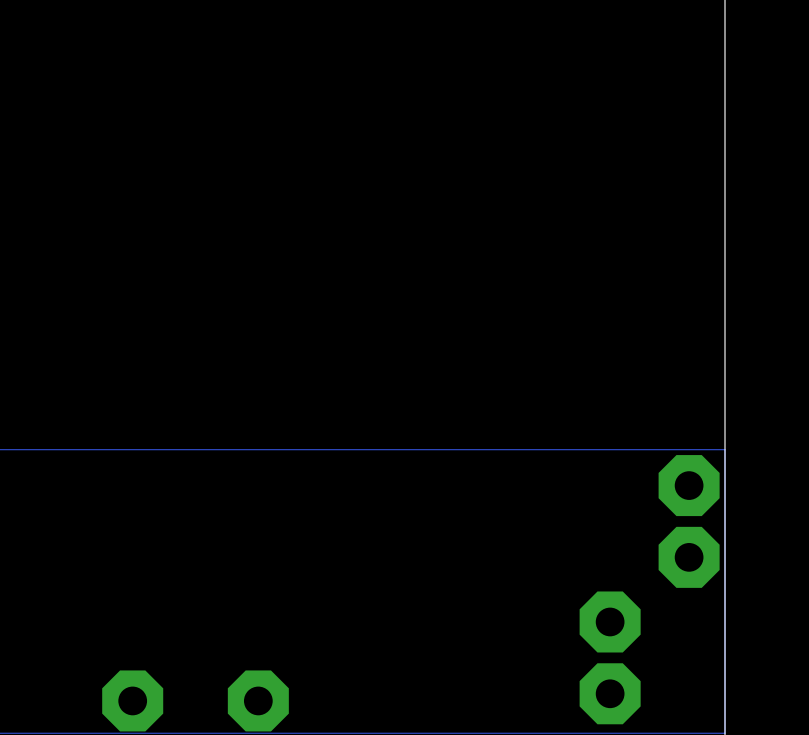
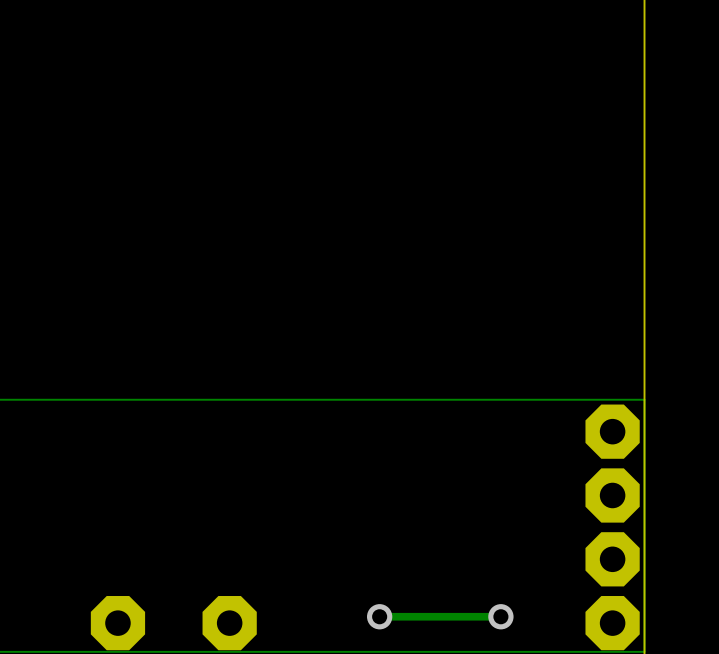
part: (610, 621) -> none
part: none -> (612, 559)
via: none -> (379, 616)
track: none -> (500, 616) (379, 616)
via: none -> (500, 616)
part: (610, 693) -> none
part: none -> (612, 623)

